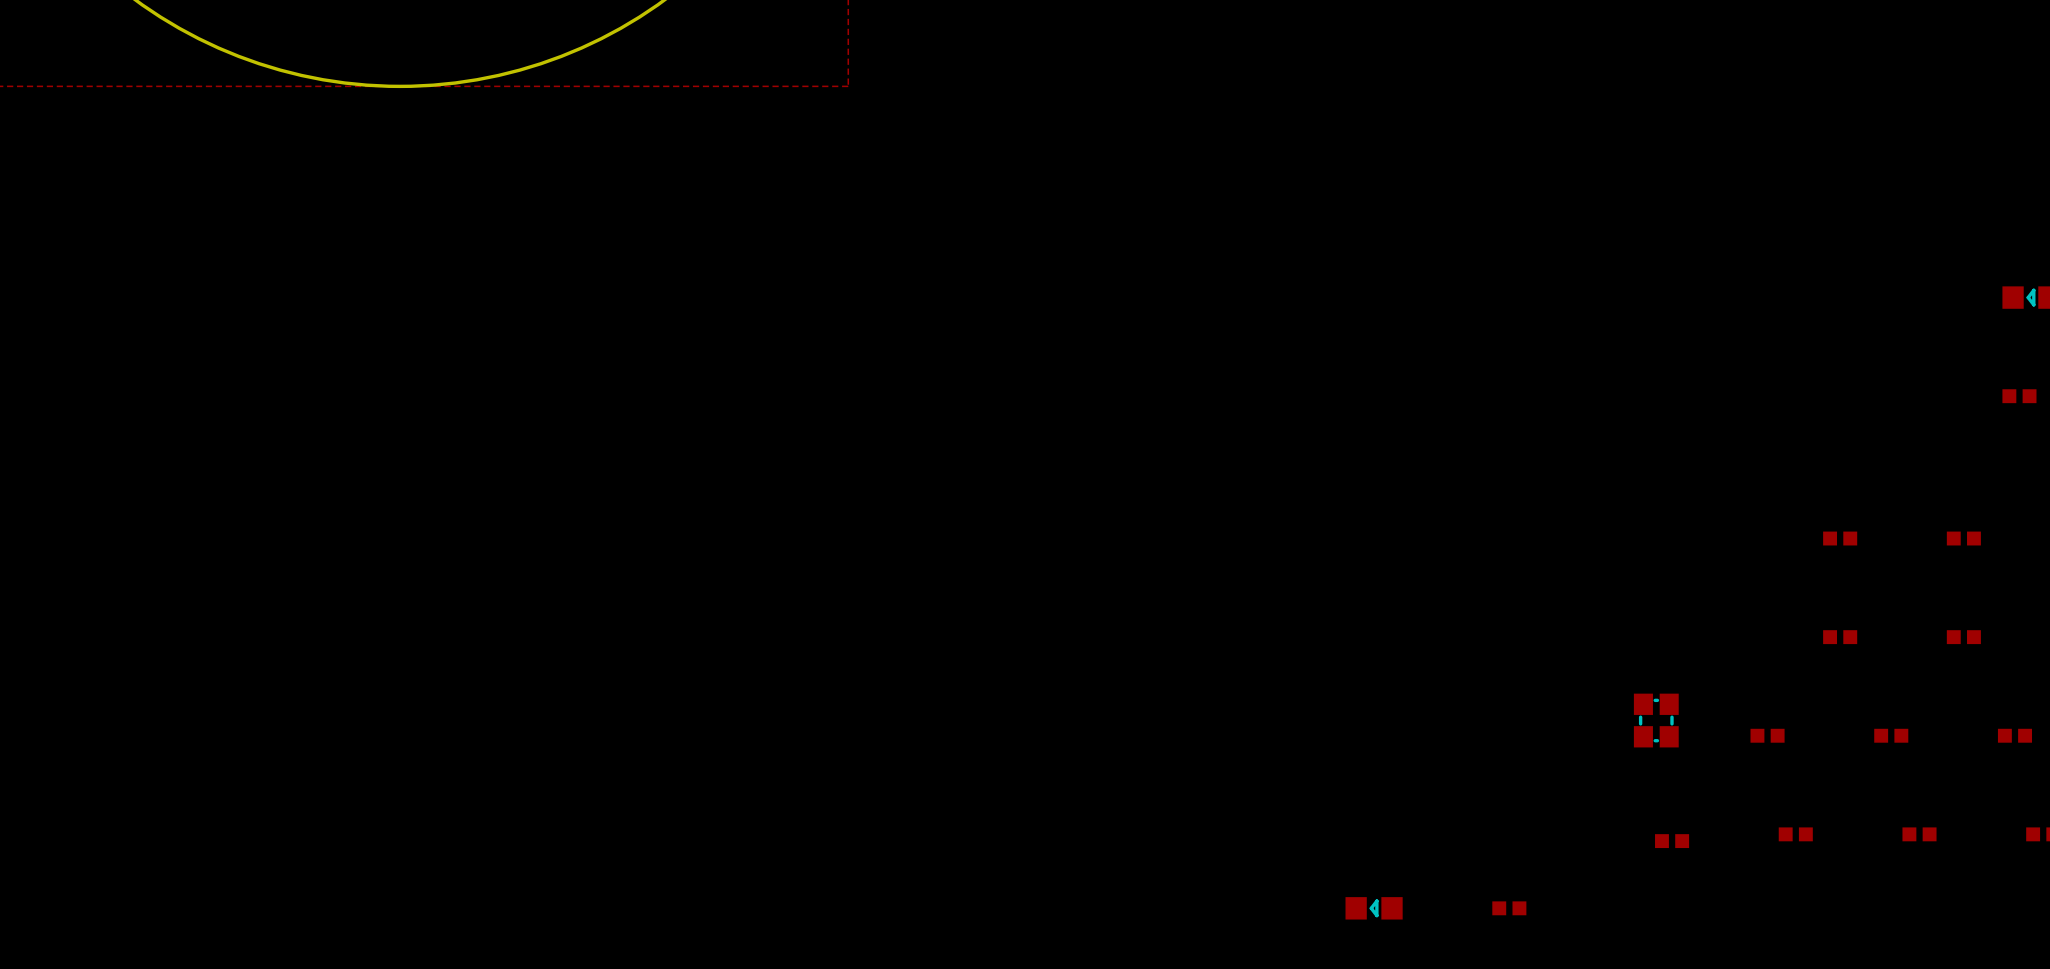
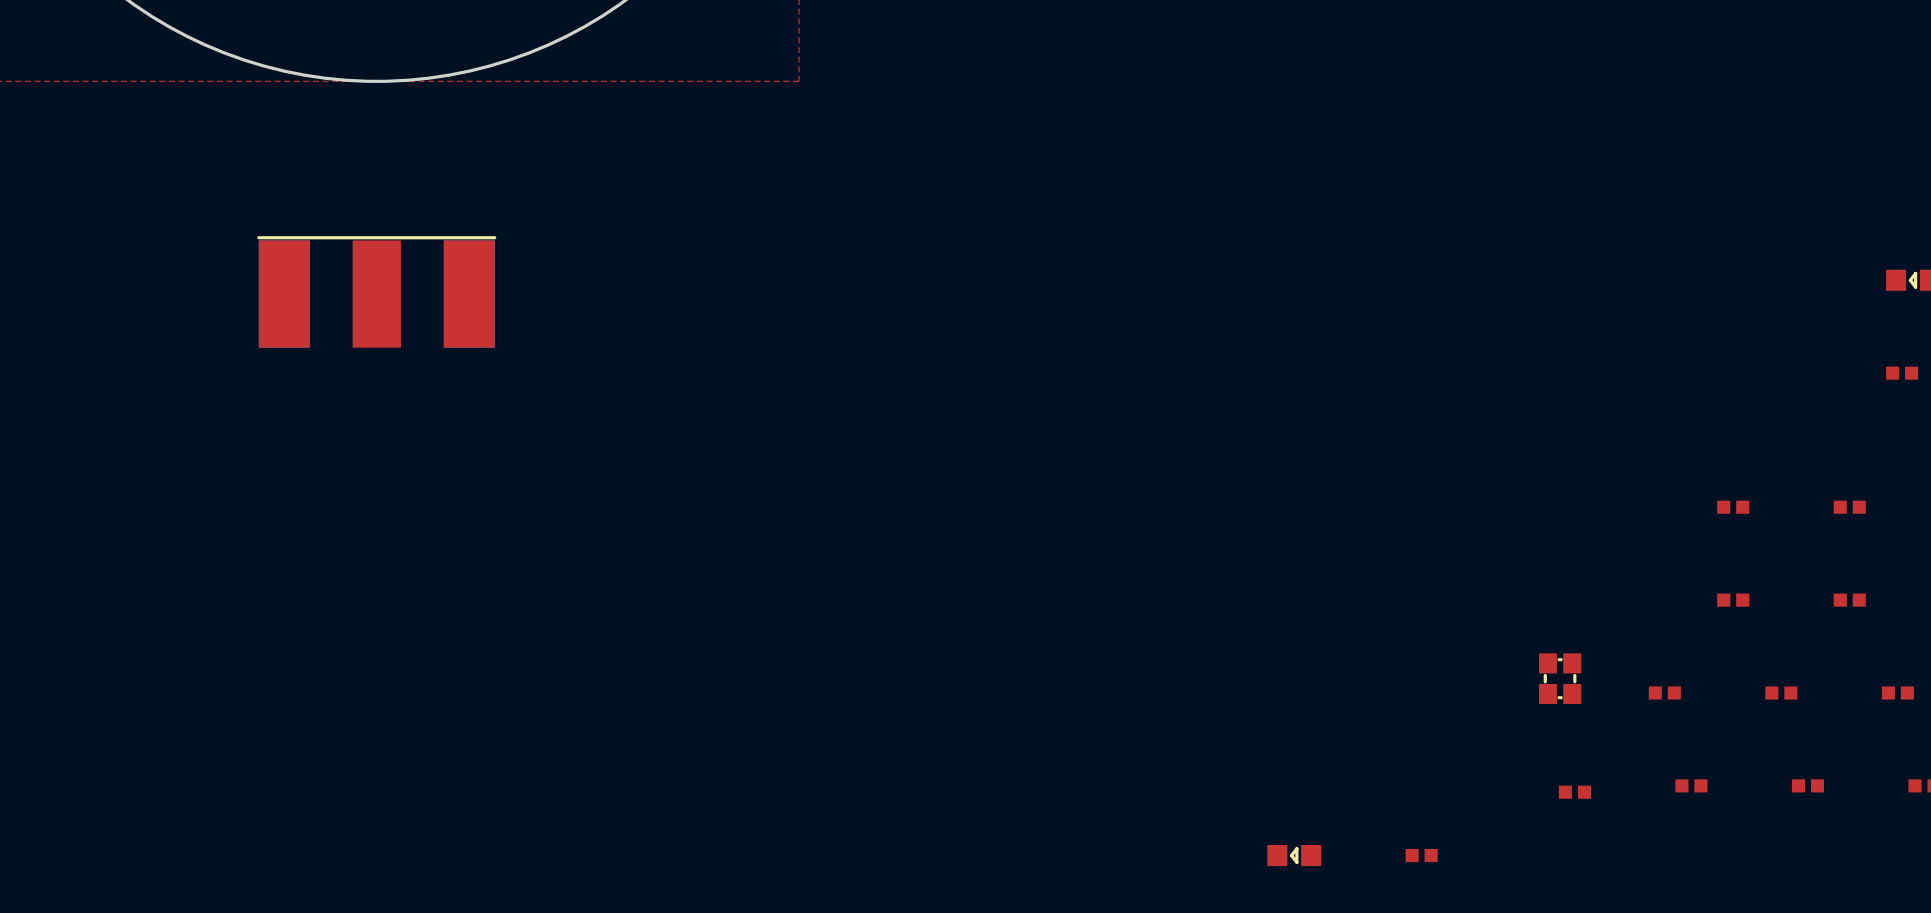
part: none -> (376, 291)

